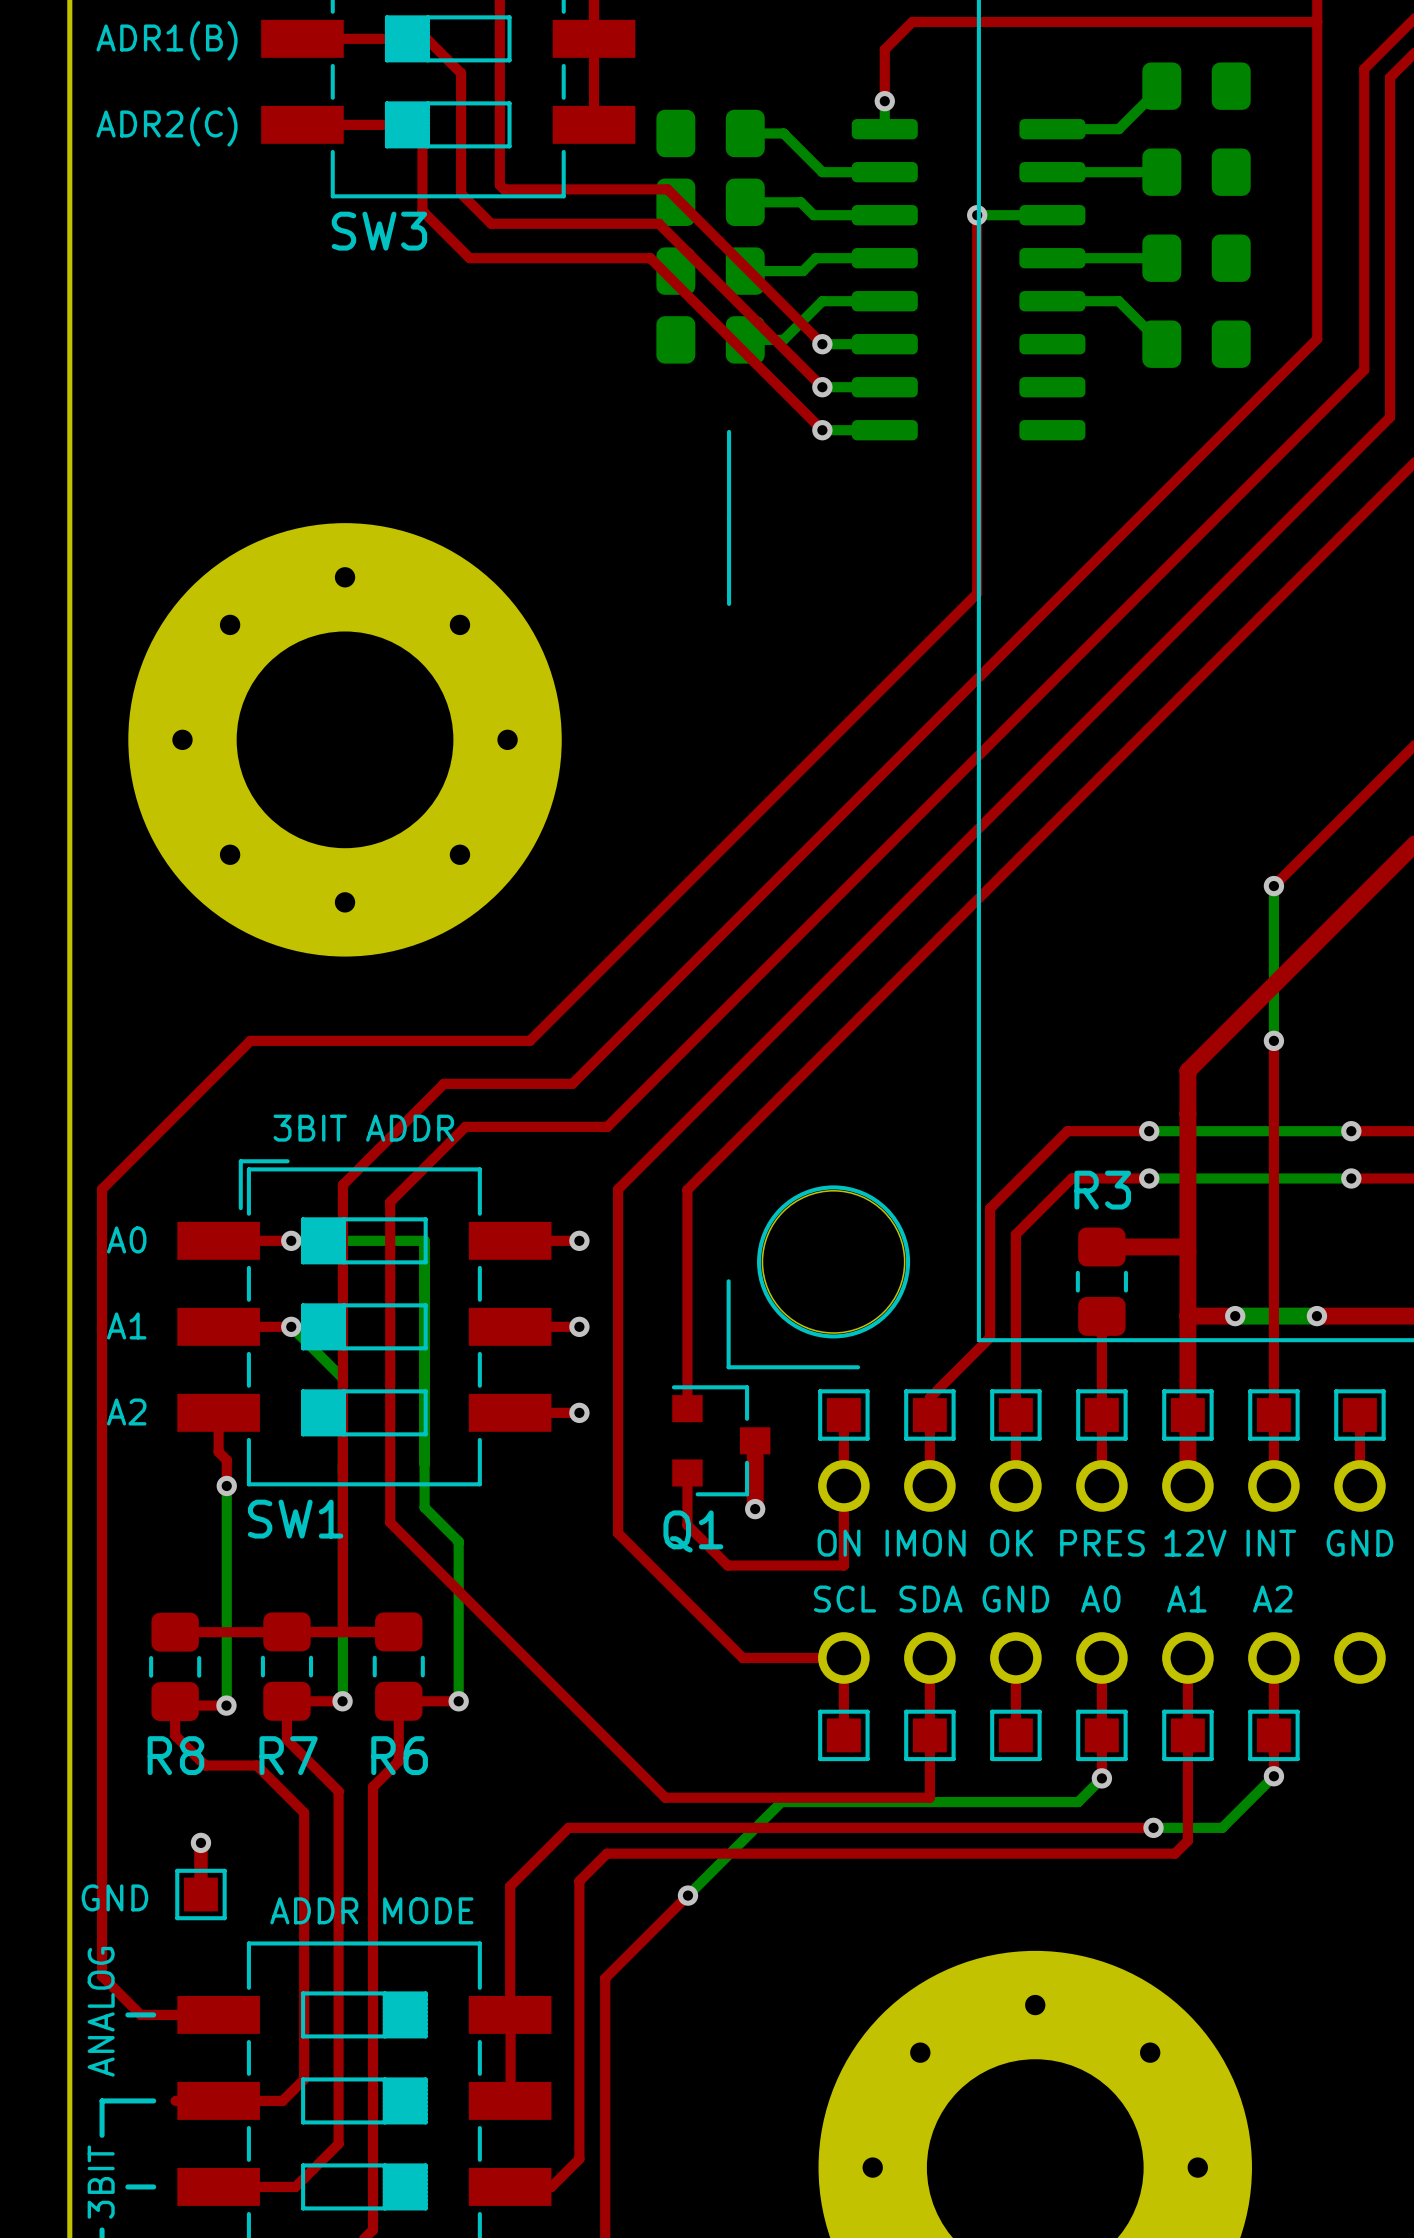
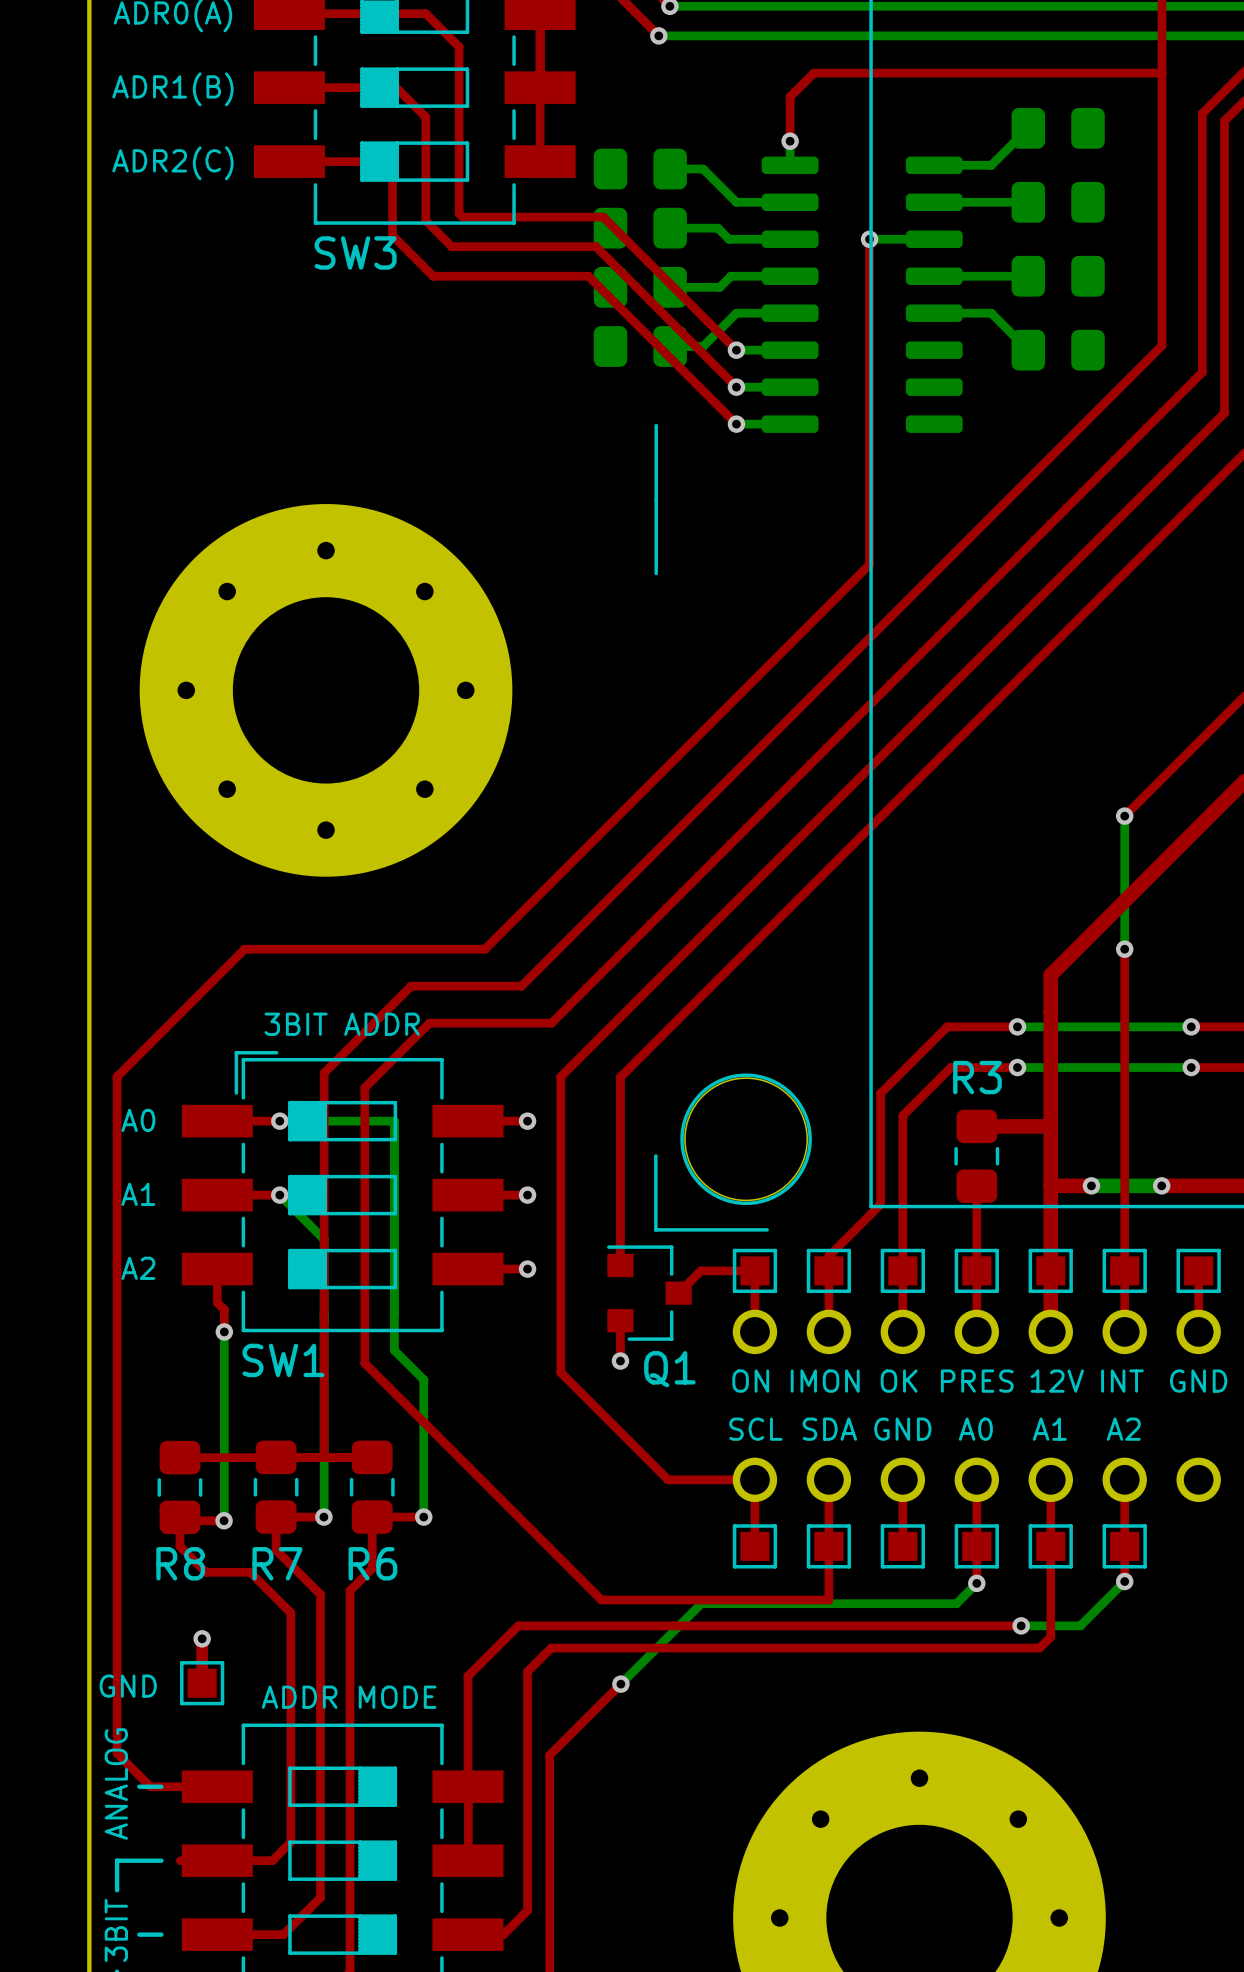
top track: (755, 1440) (755, 1509) -> (678, 1293) (700, 1270) (754, 1270)
top track: (843, 1485) (843, 1565) (727, 1565) (687, 1525) (687, 1519) -> none
via position: (755, 1509) -> (620, 1361)
Q1 name position: Q1 (693, 1531) -> Q1 (669, 1369)

